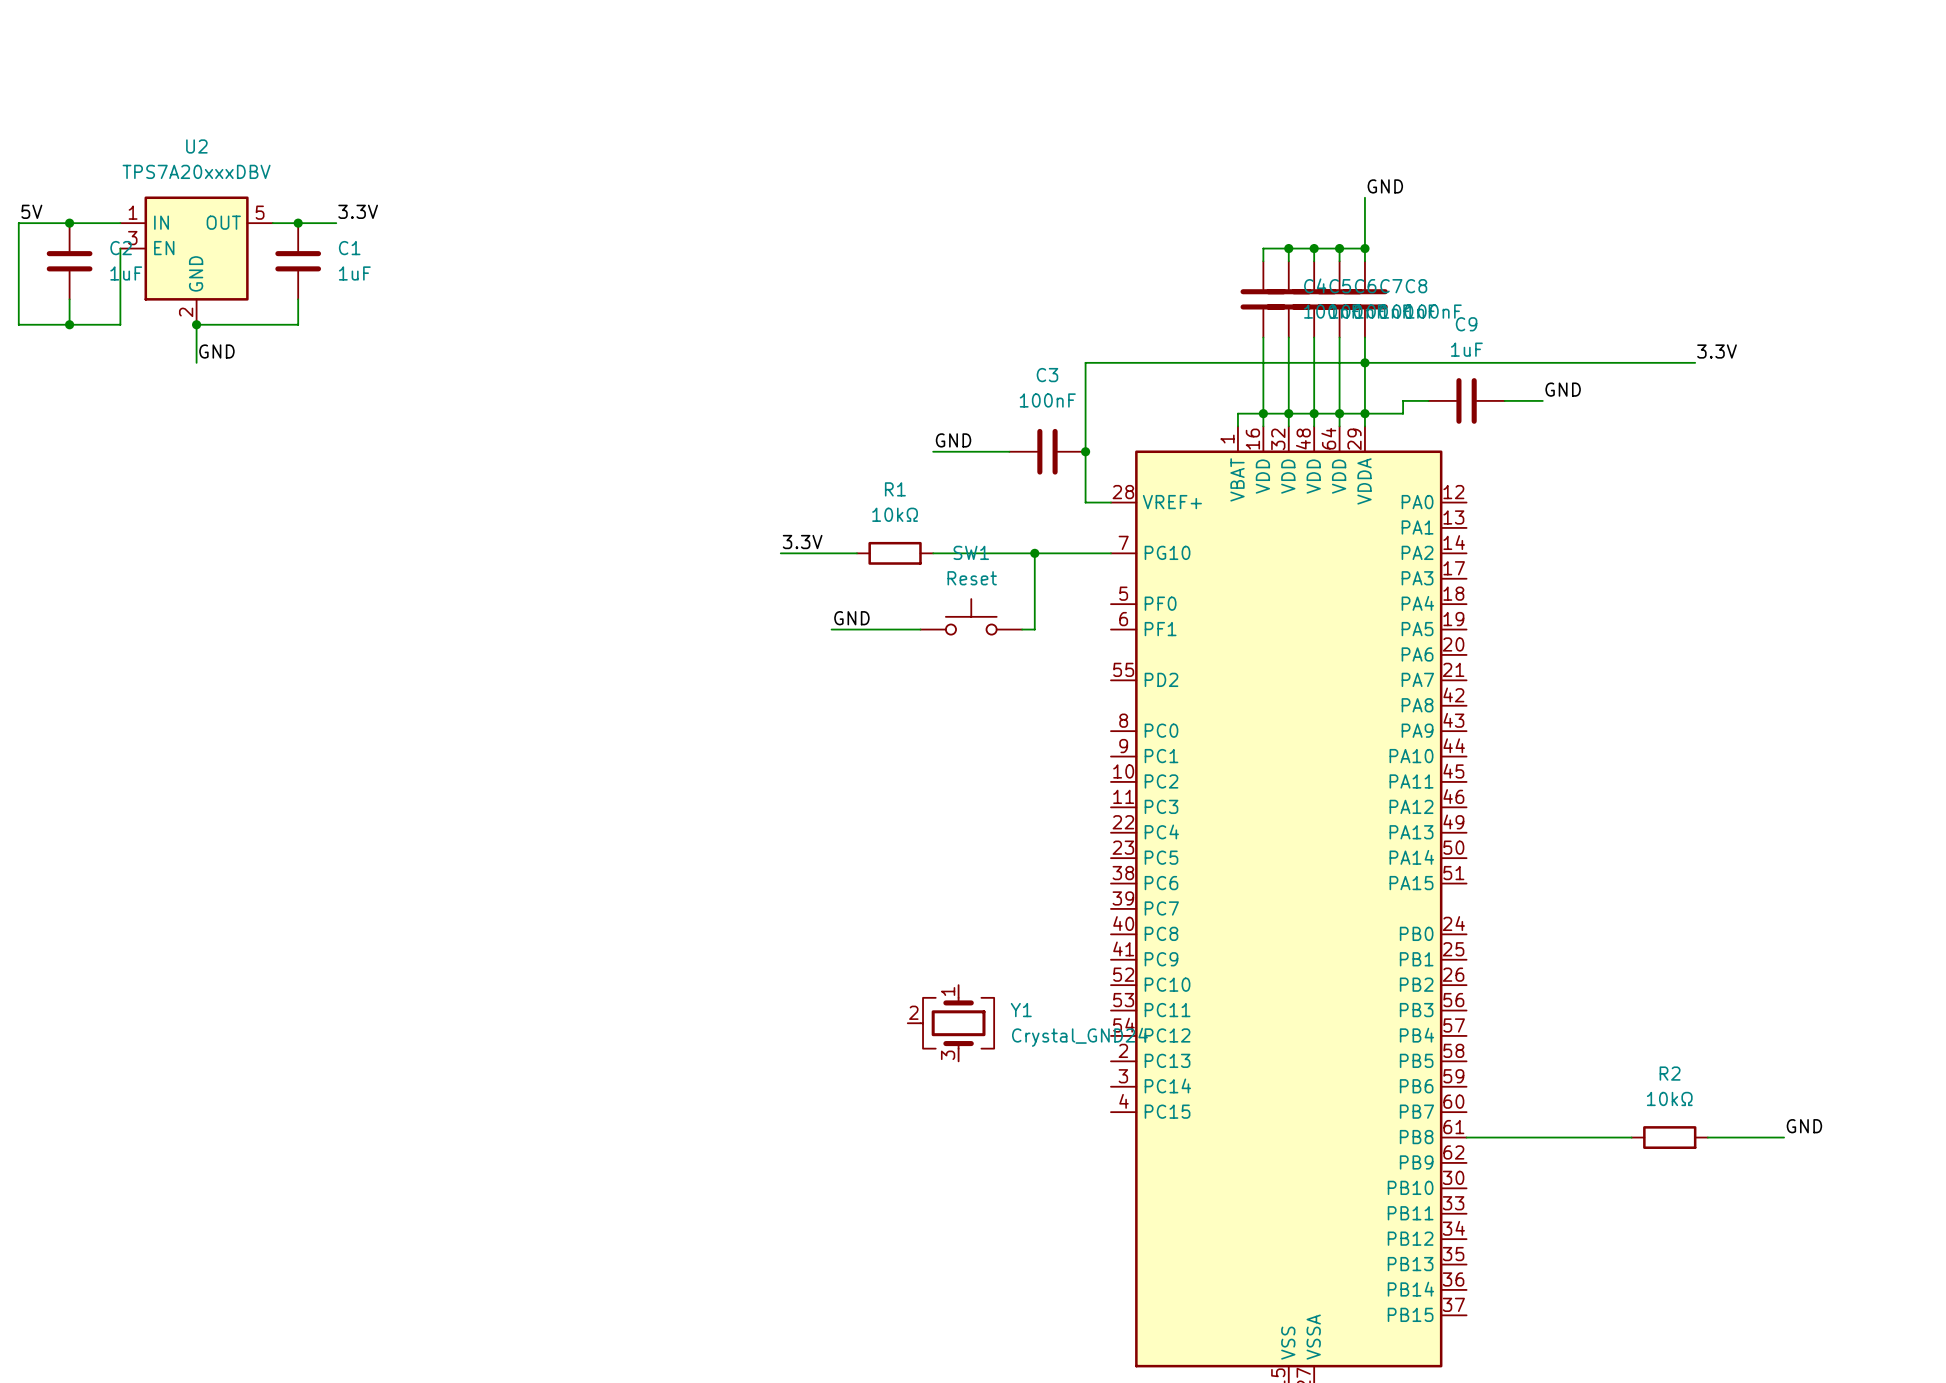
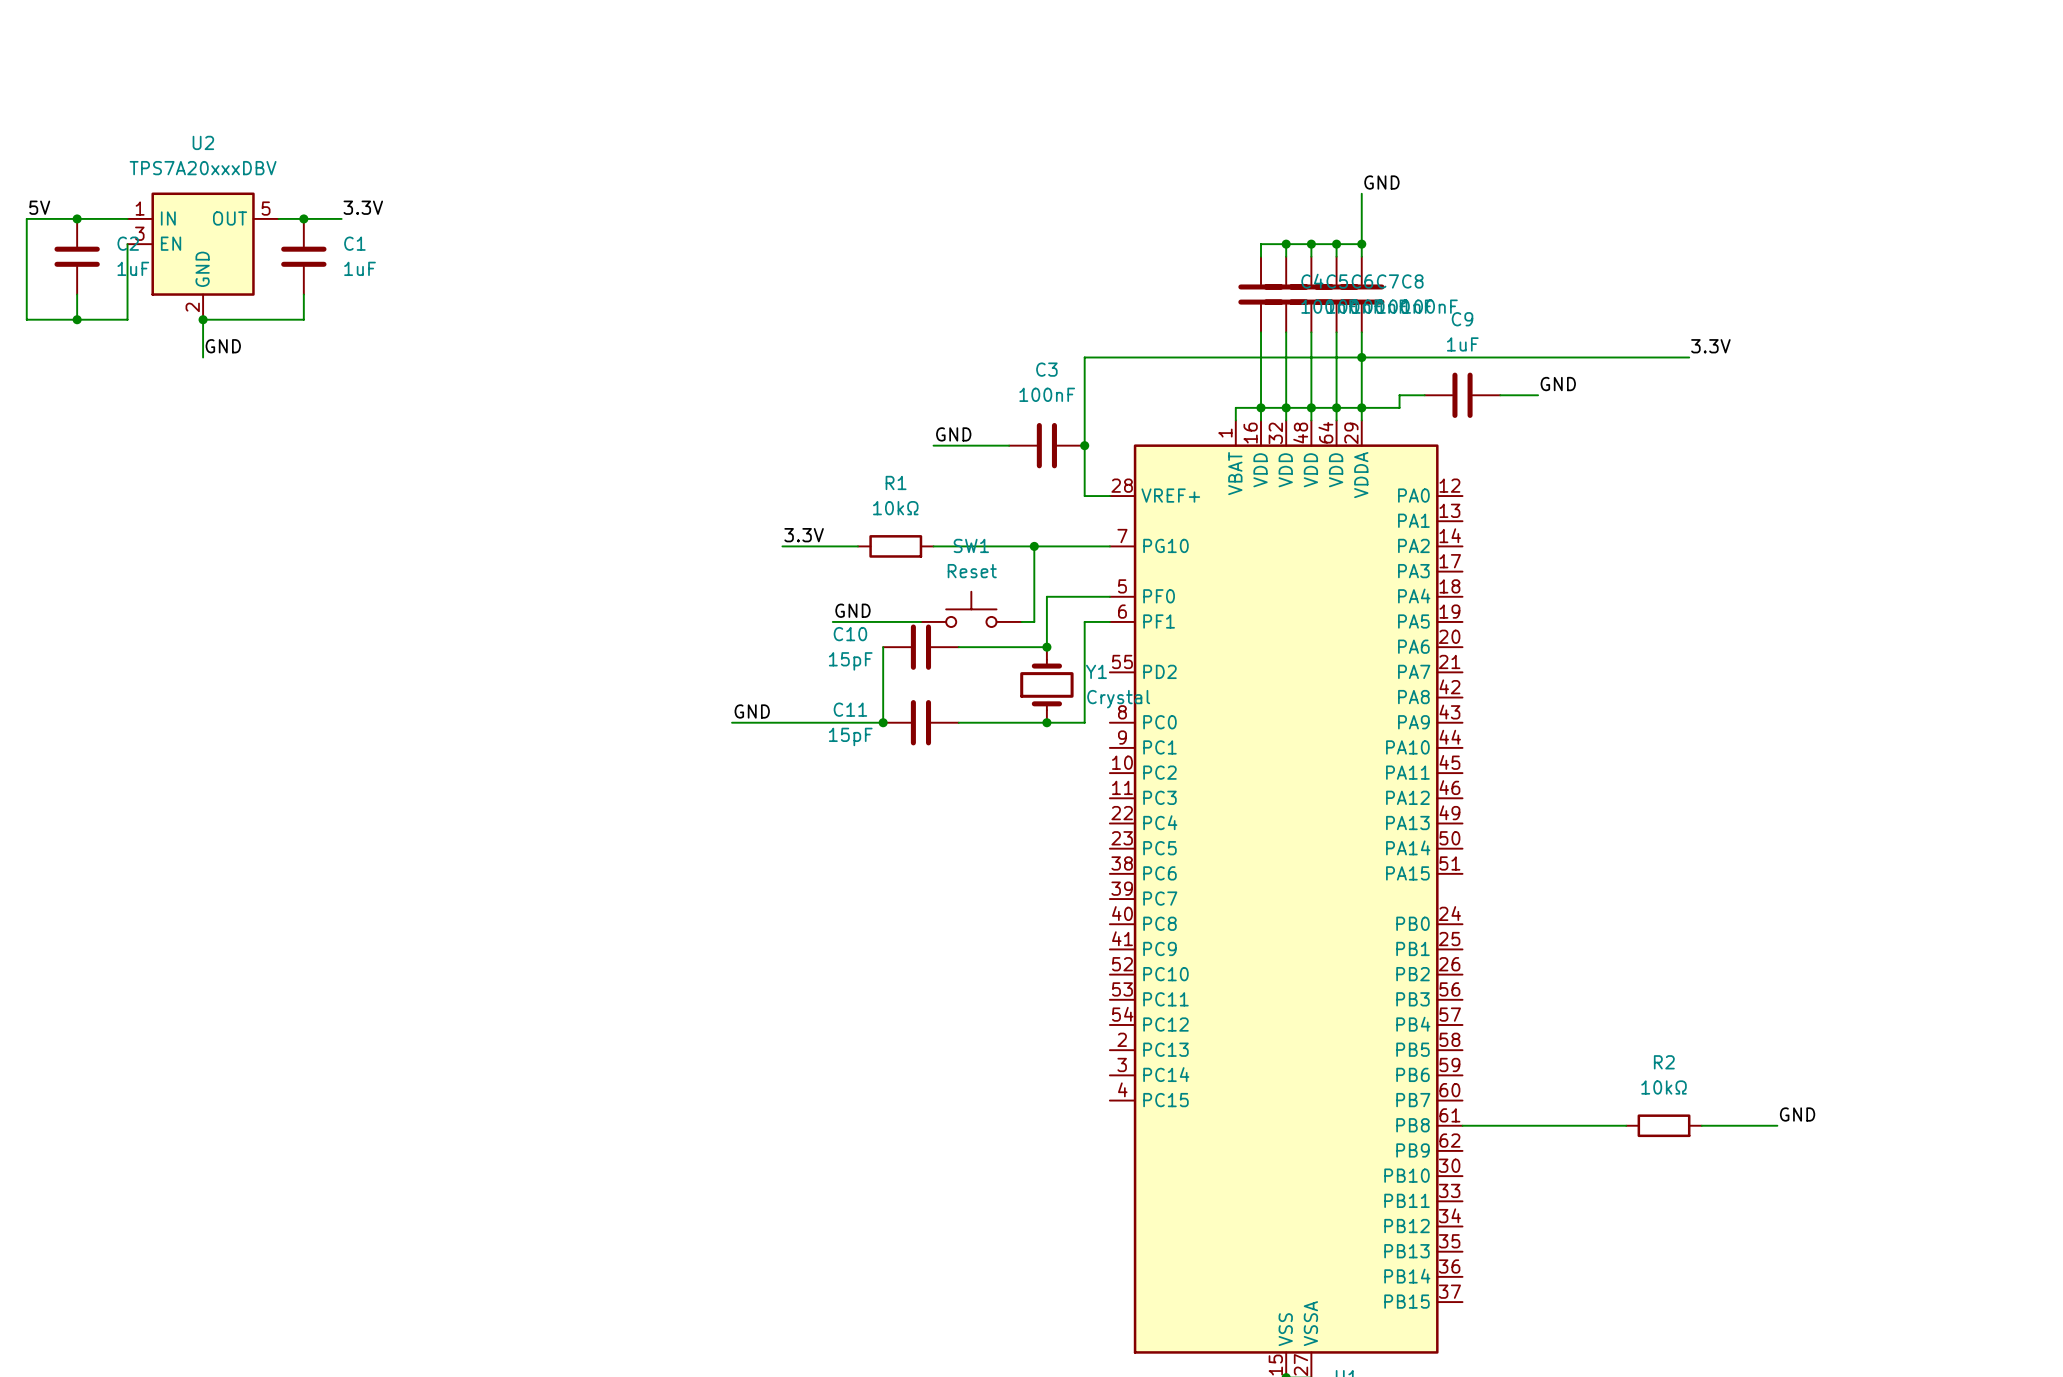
wire: none -> (1109, 596) (1046, 596) (1046, 647) (958, 647)
wire: none -> (1109, 621) (1084, 621) (1084, 722) (958, 722)
wire: none -> (883, 647) (883, 722) (732, 722)
C10: none -> 15pF (920, 647)
junction: none -> (1046, 647)
label: none -> GND (752, 711)
junction: none -> (883, 722)
C11: none -> 15pF (920, 722)
junction: none -> (1046, 722)
Y1 symbol: [907, 985, 995, 1062] -> [1020, 647, 1074, 723]
Y1 name position: Y1 (1021, 1010) -> Y1 (1096, 671)
Y1 value: Crystal_GND24 (1079, 1037) -> Crystal (1118, 699)

